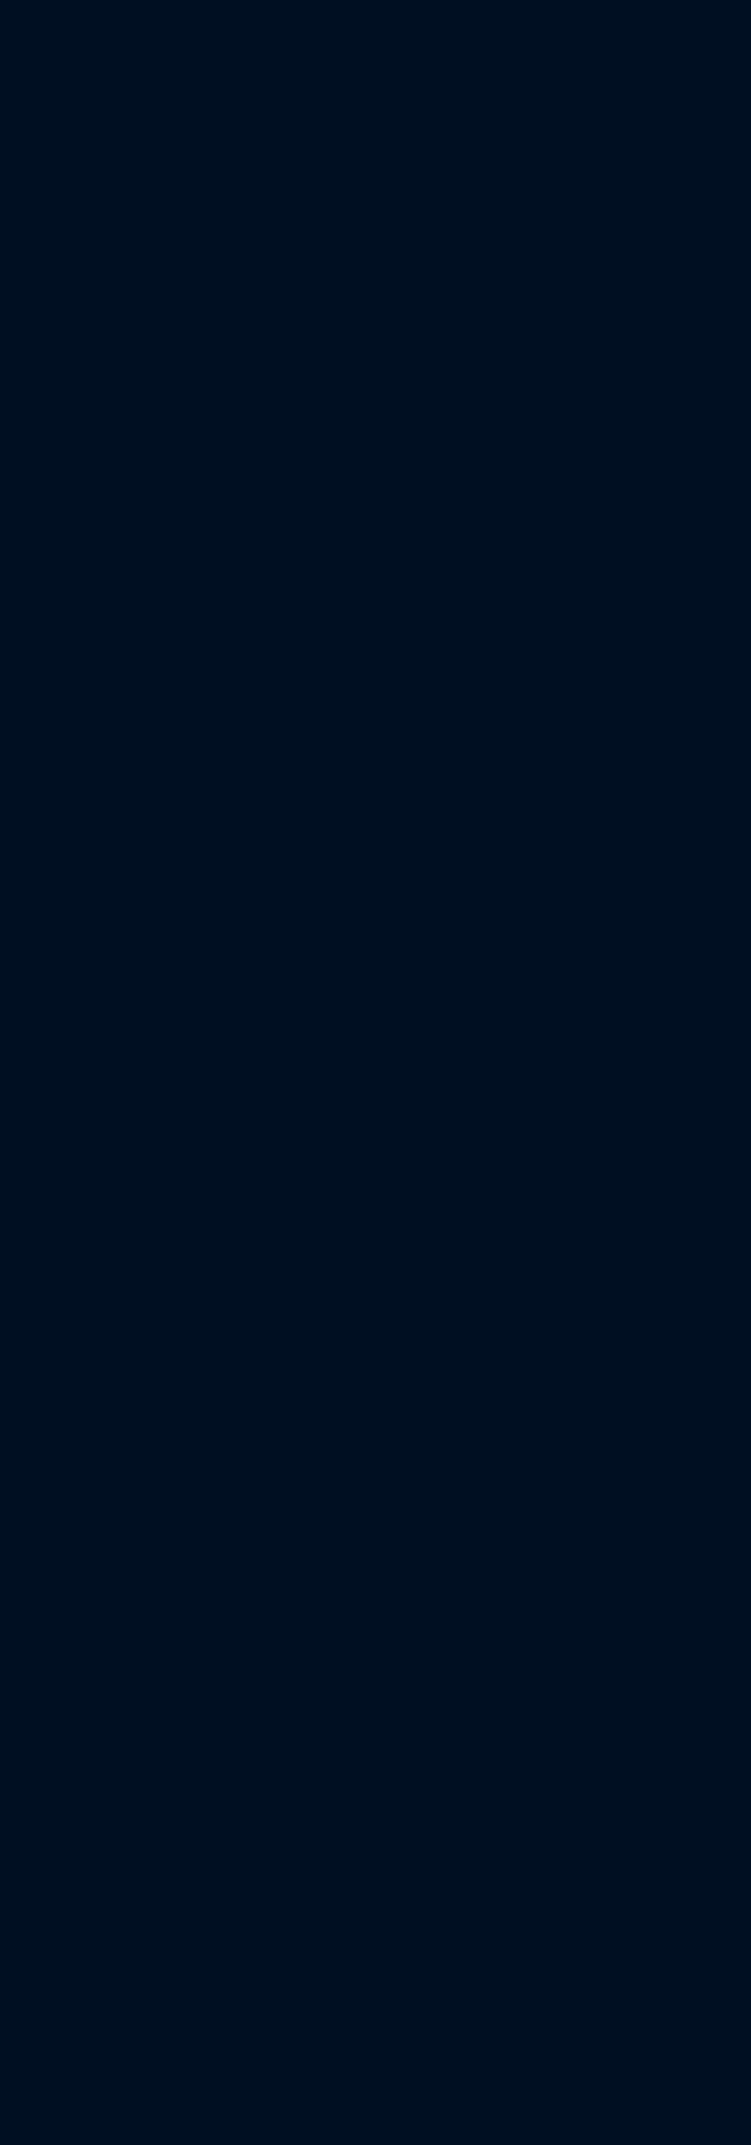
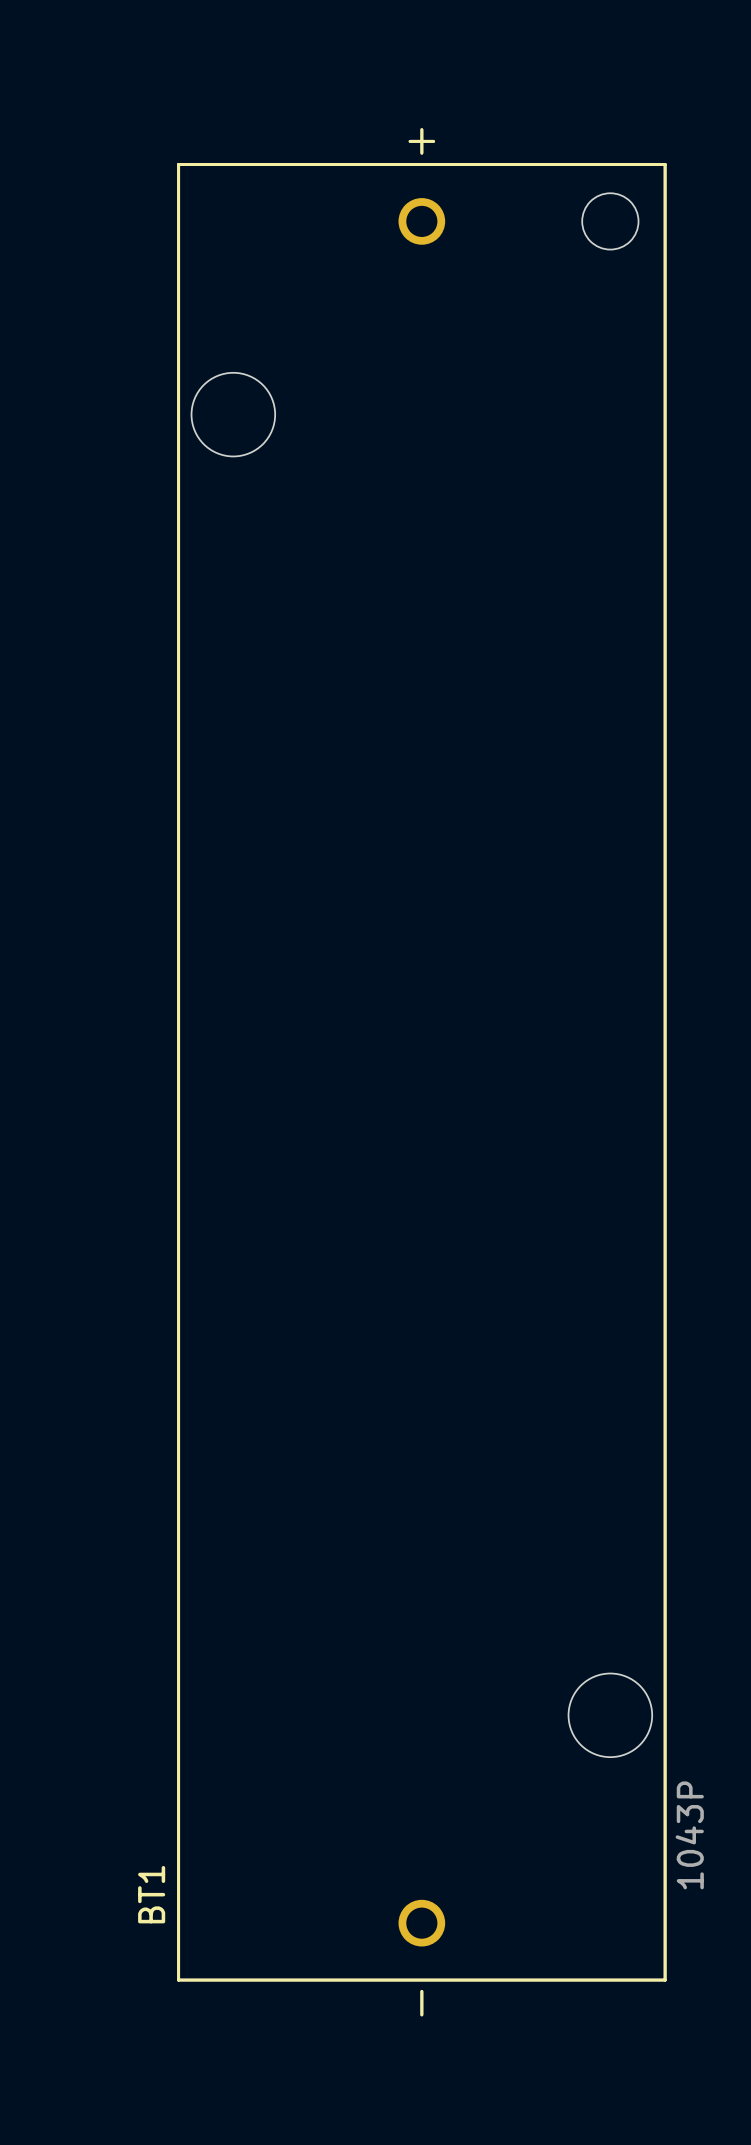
BT1: none -> 1043P (421, 1072)

